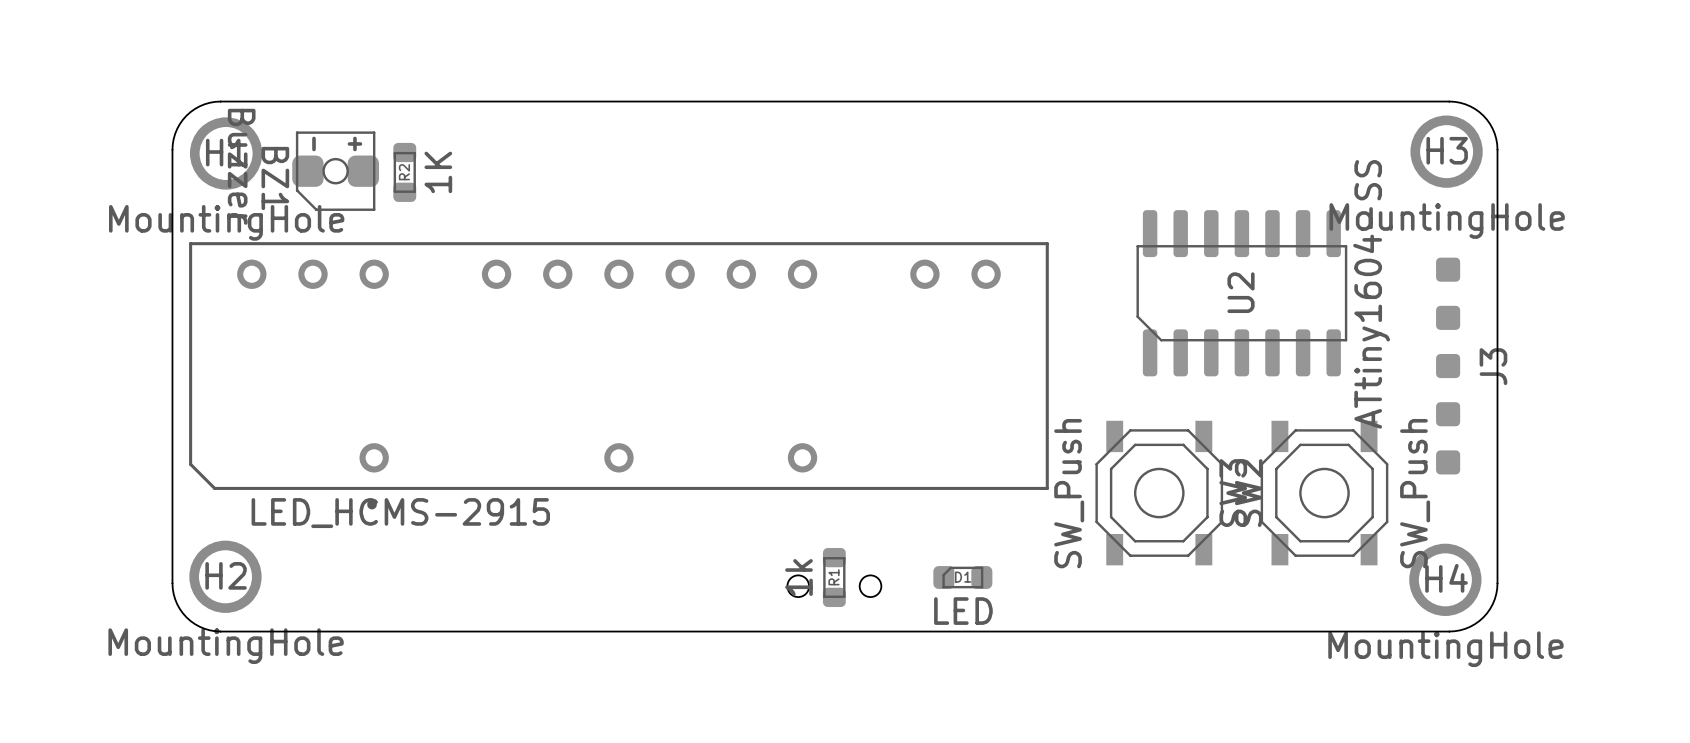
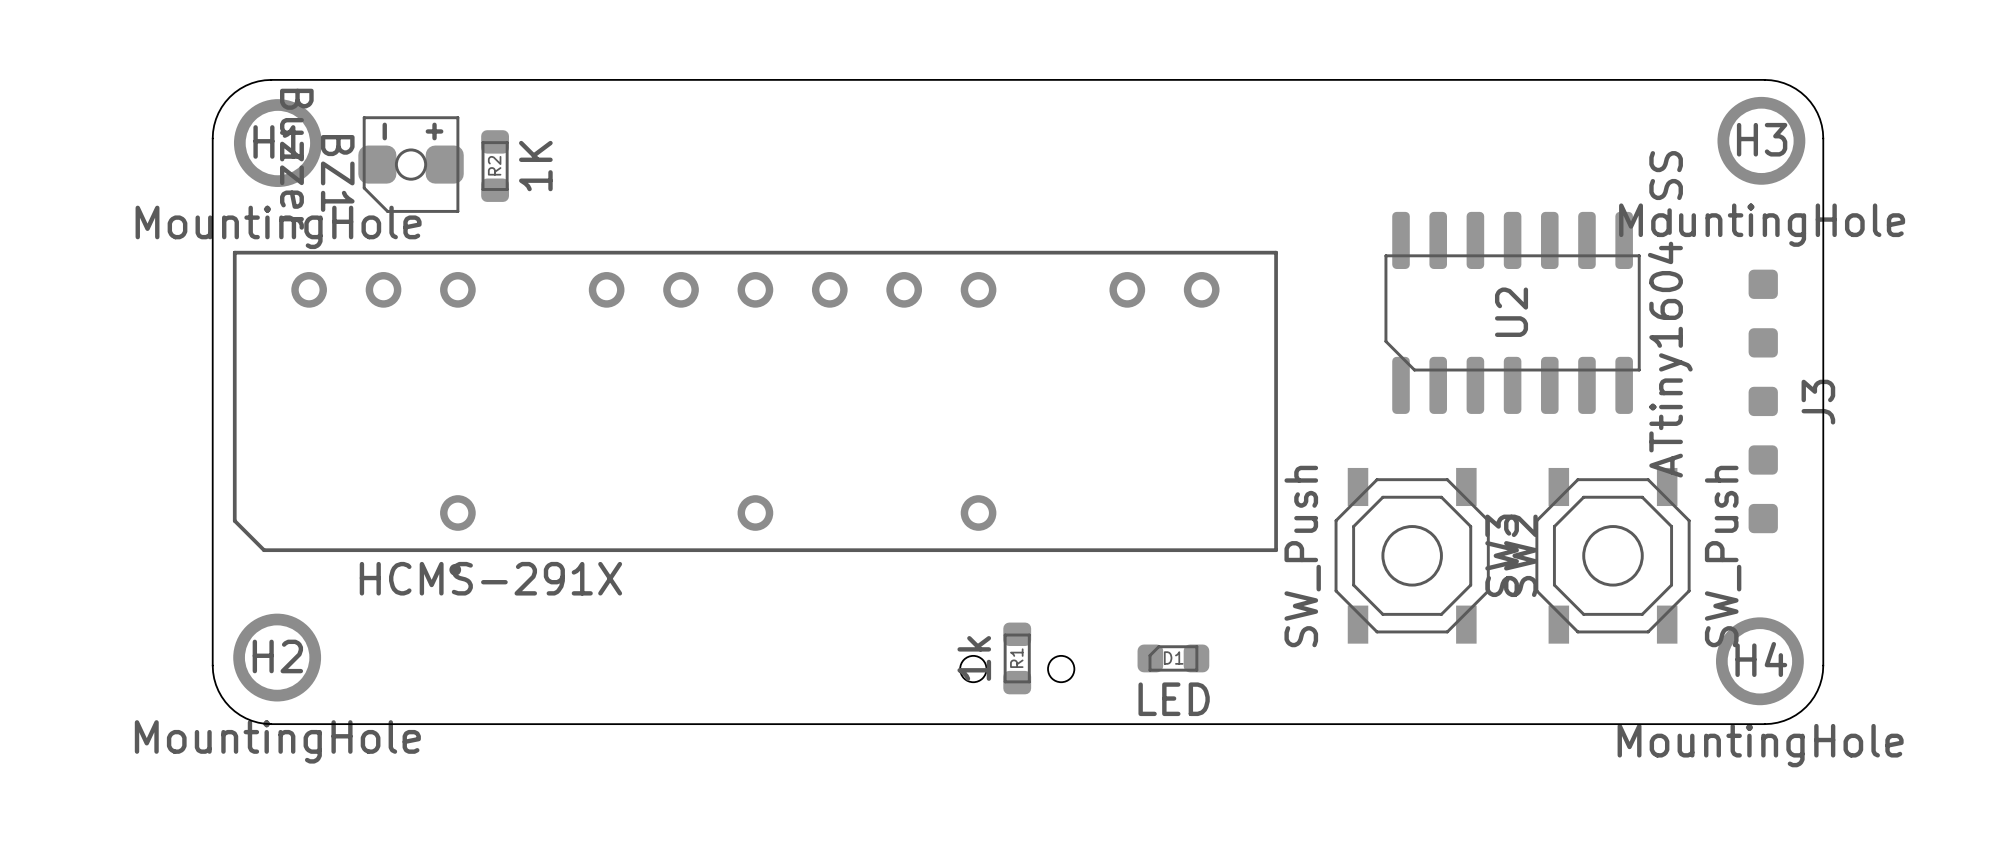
part value: LED_HCMS-2915 (400, 513) -> HCMS-291X (490, 578)

